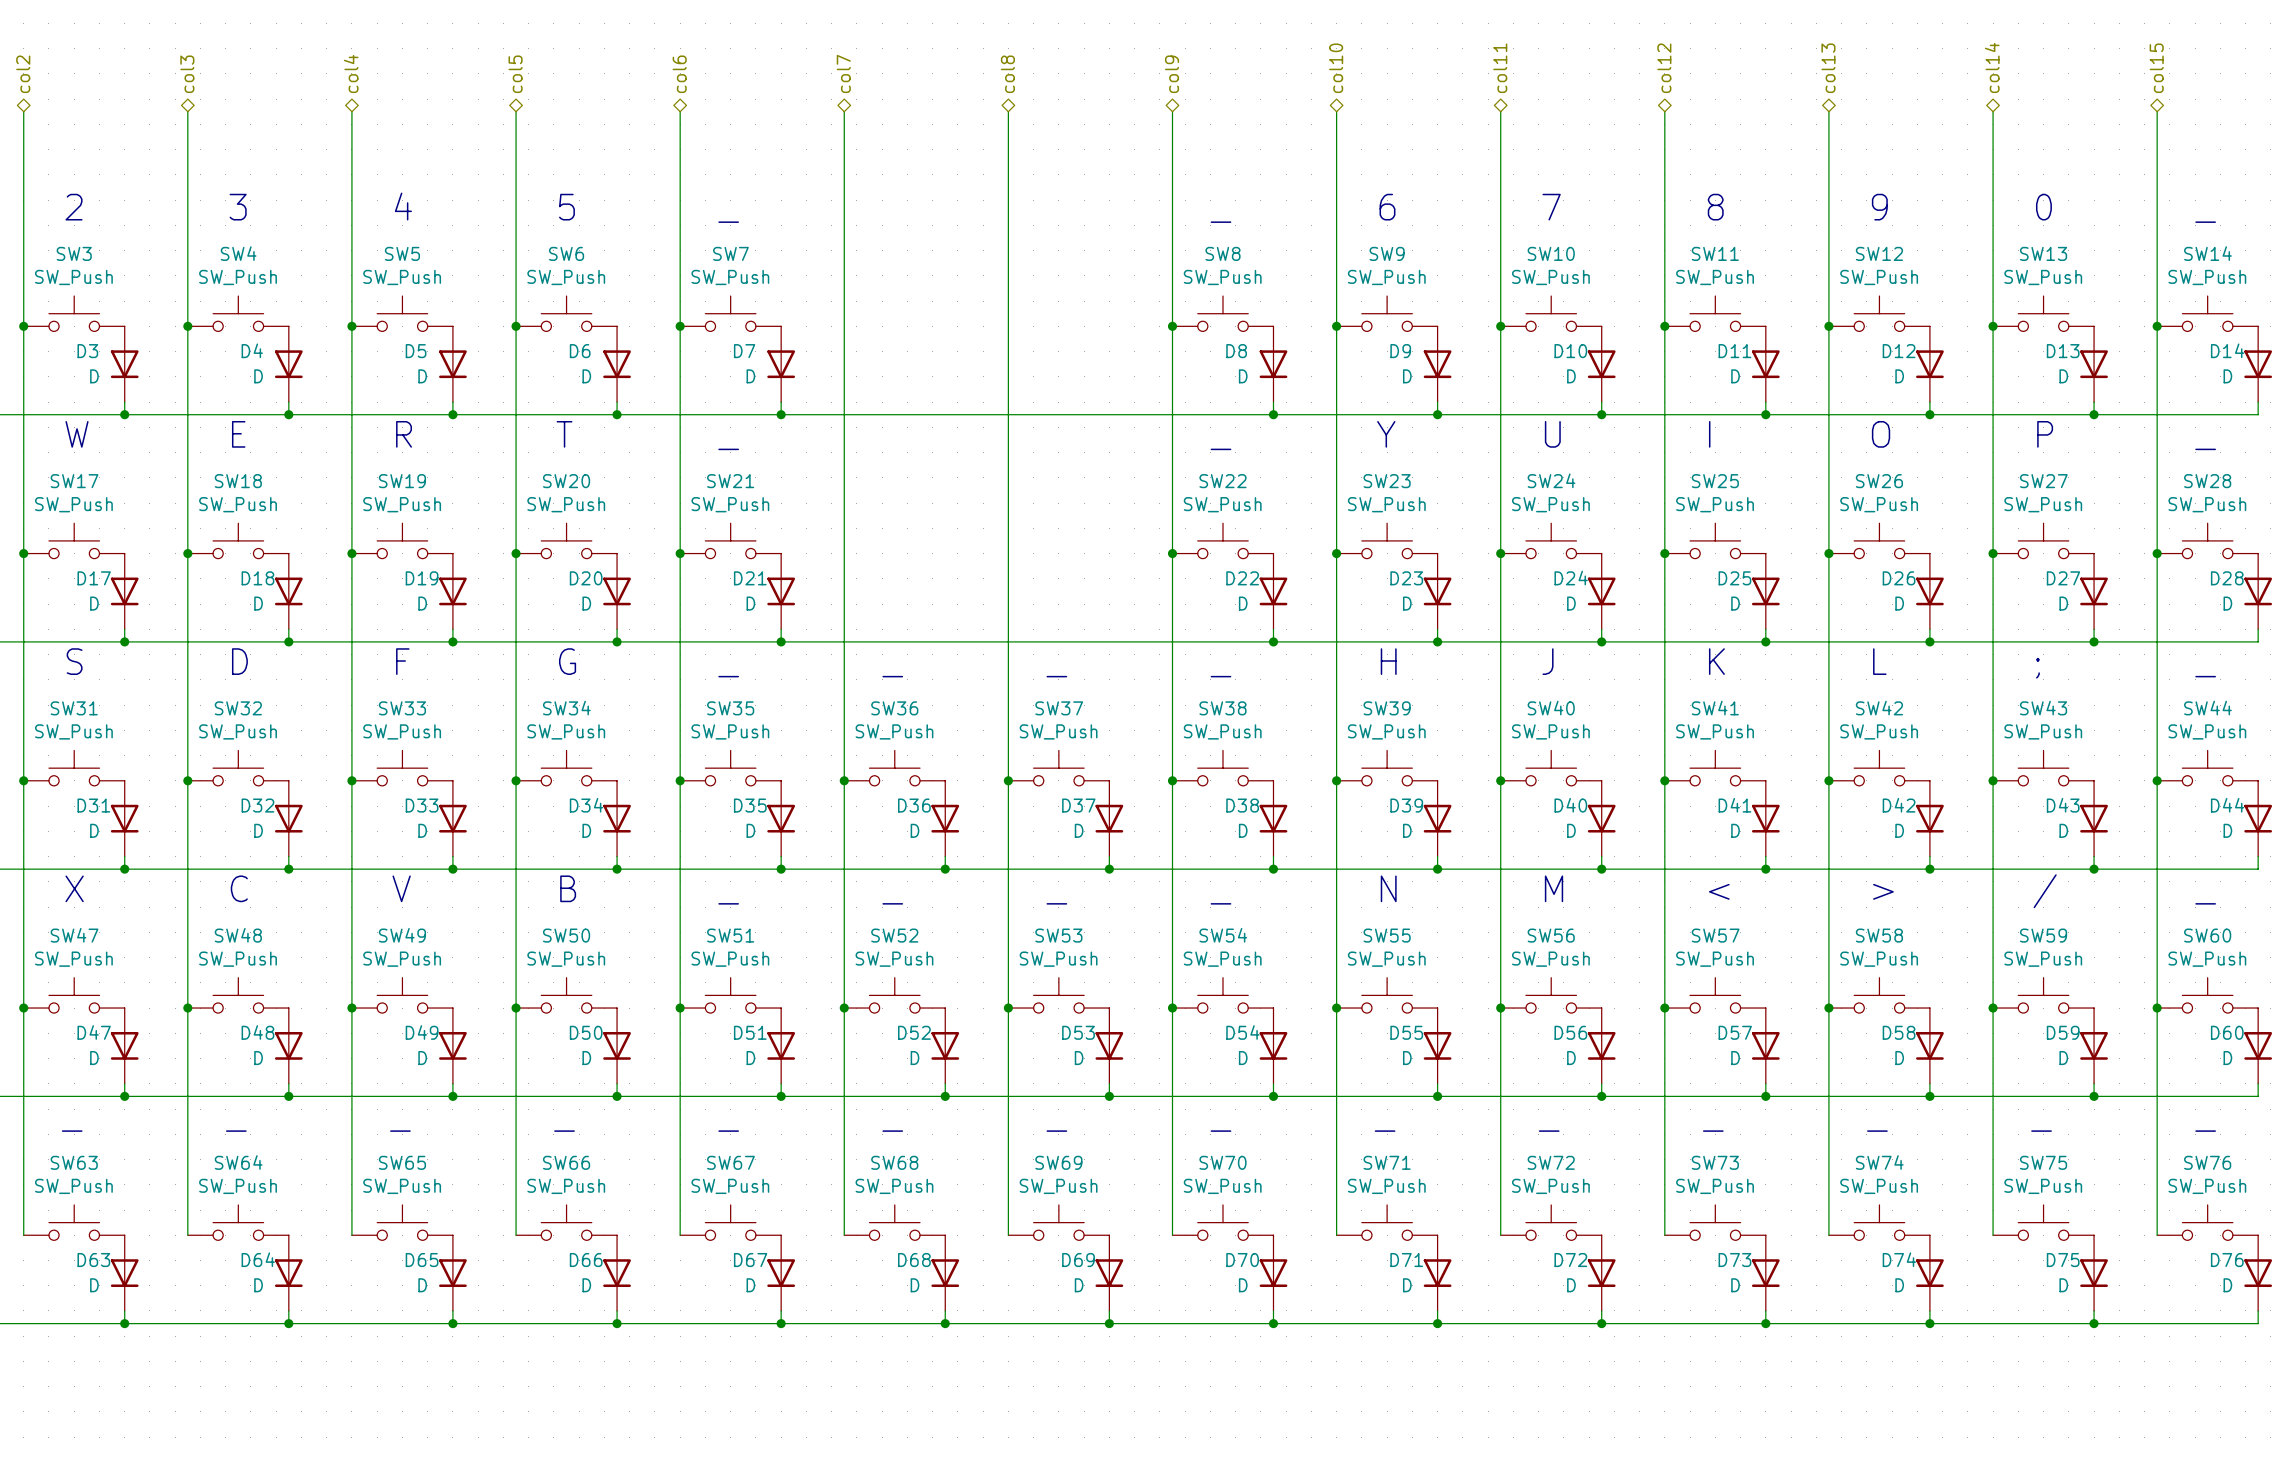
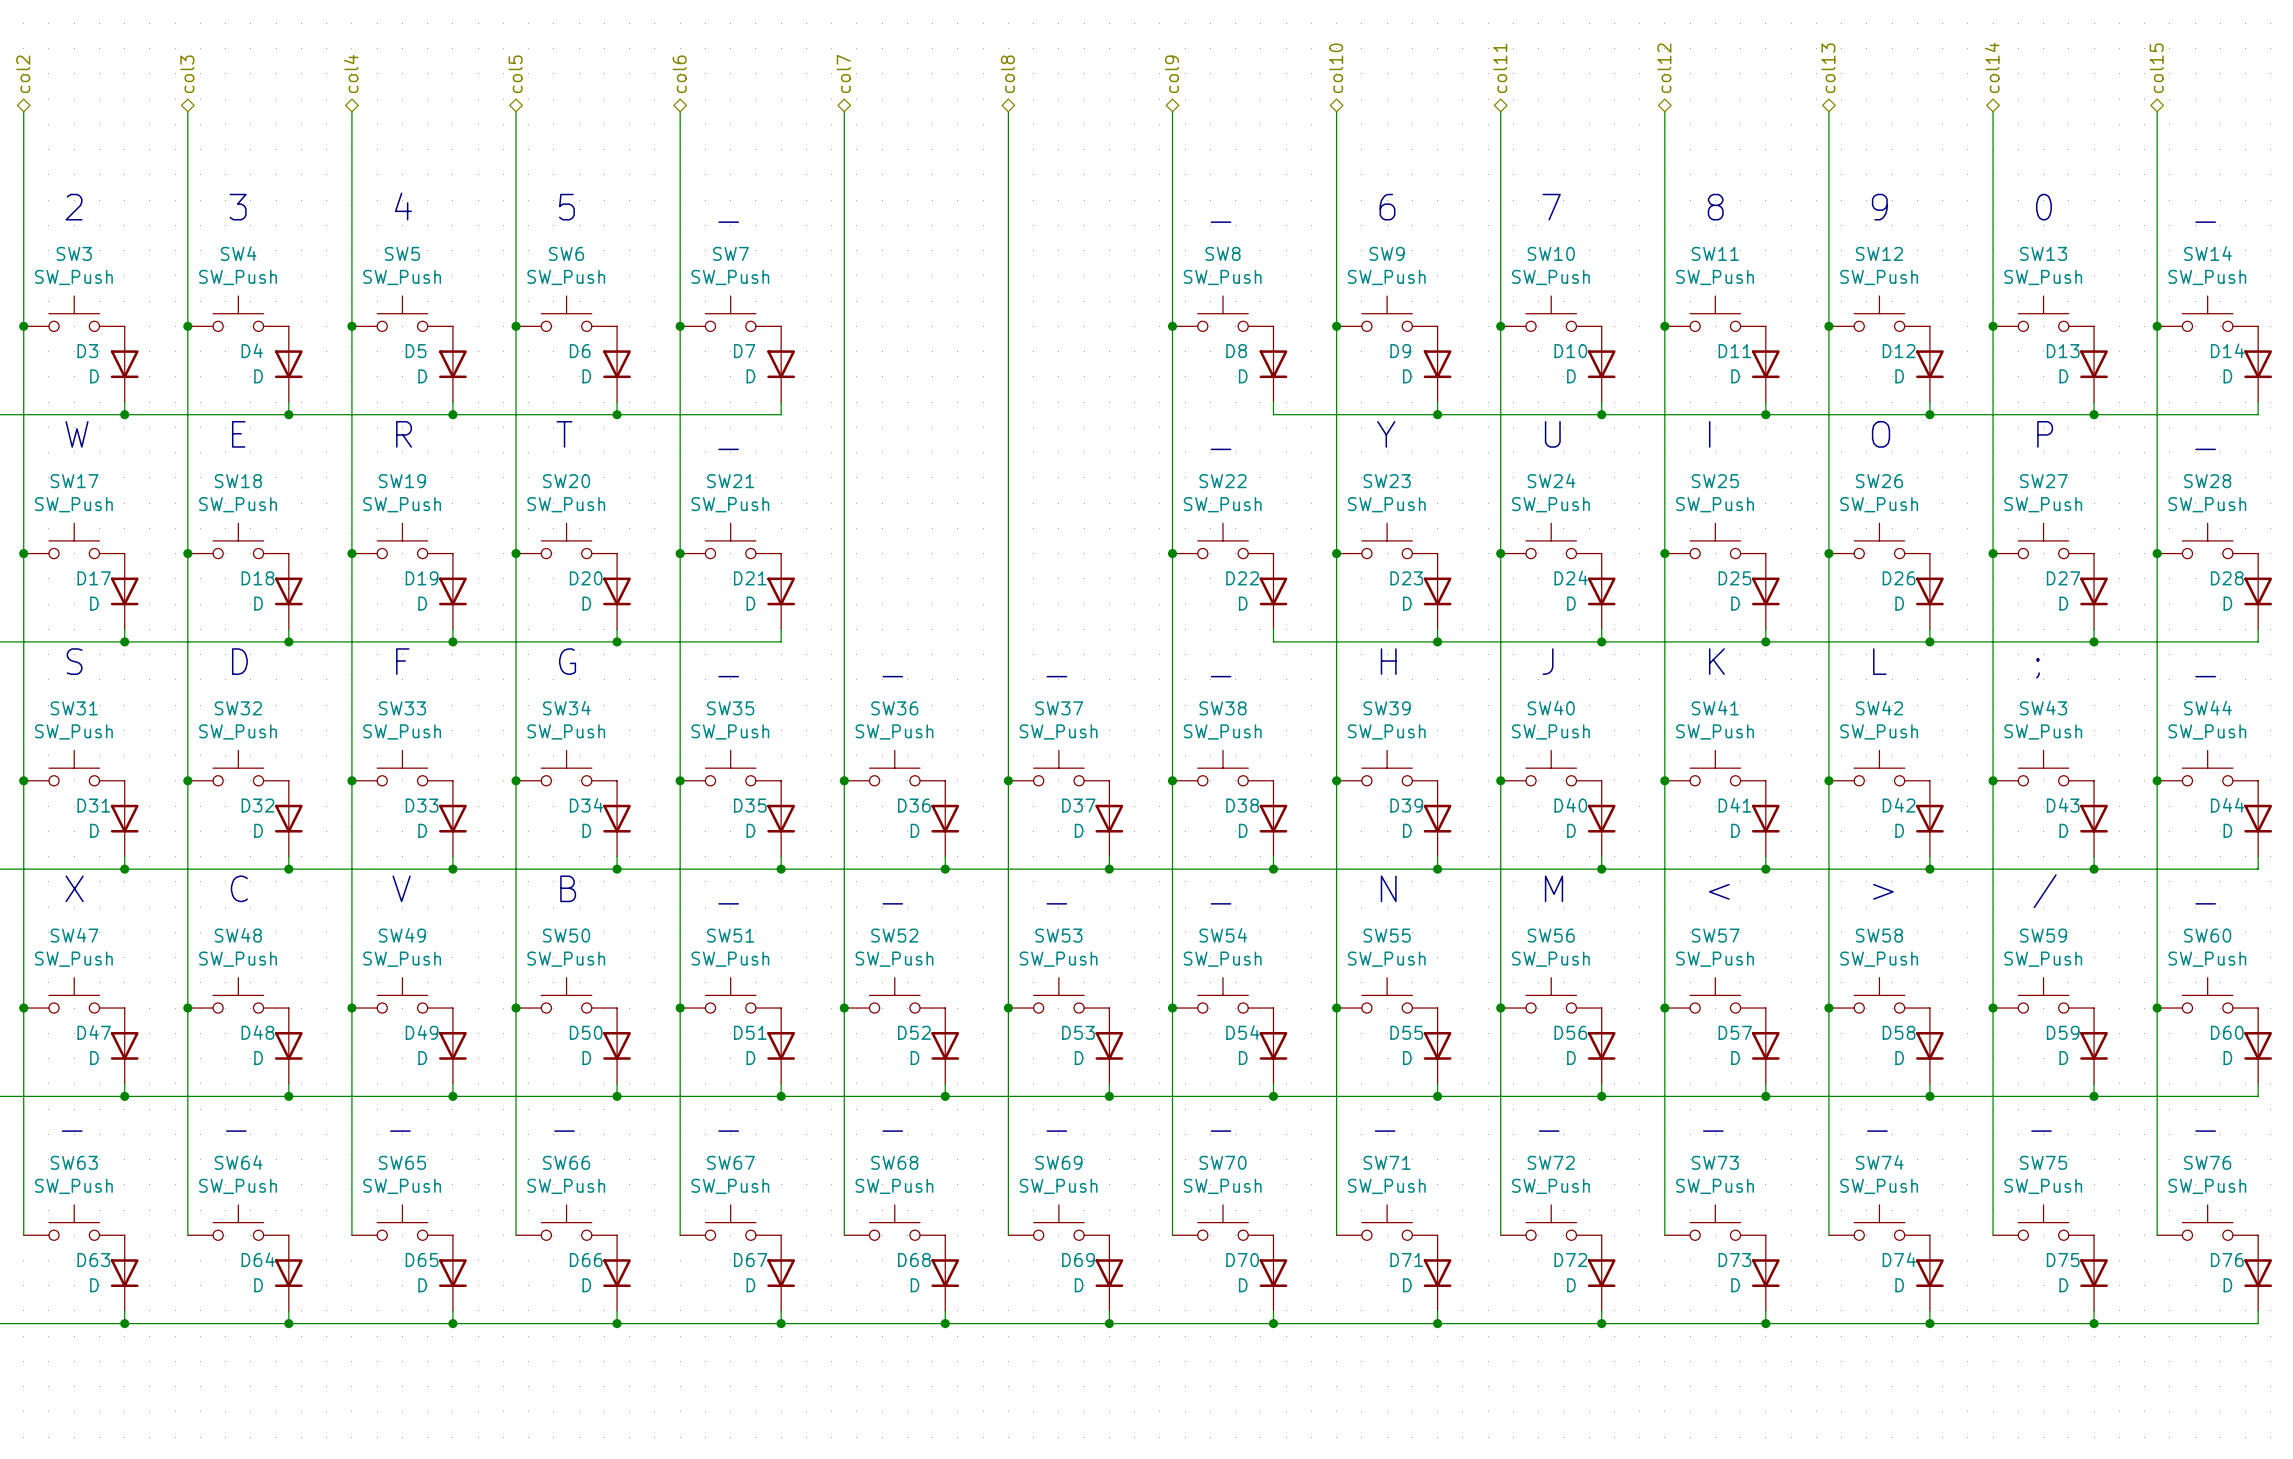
wire: (781, 414) (1273, 414) -> none
junction: (781, 414) -> none
junction: (1273, 414) -> none
wire: (781, 641) (1273, 641) -> none
junction: (781, 641) -> none
junction: (1273, 641) -> none

